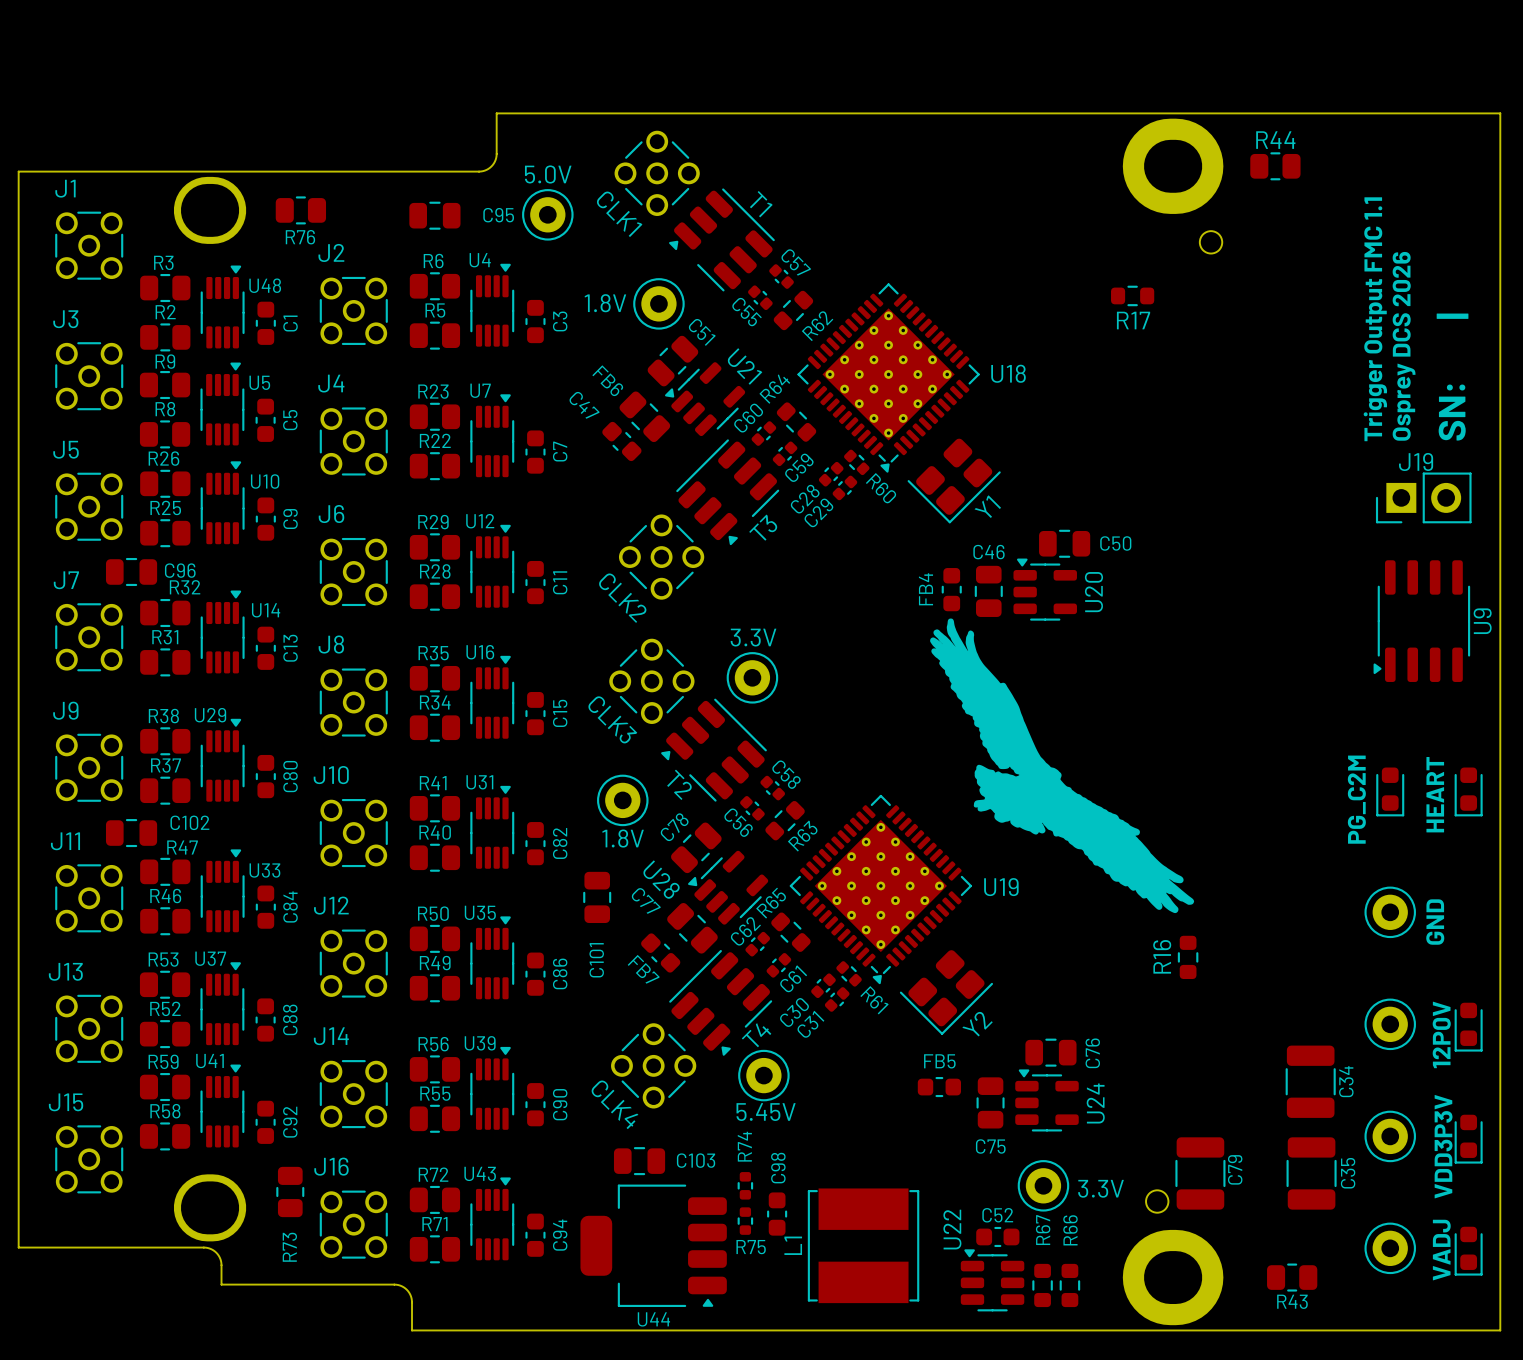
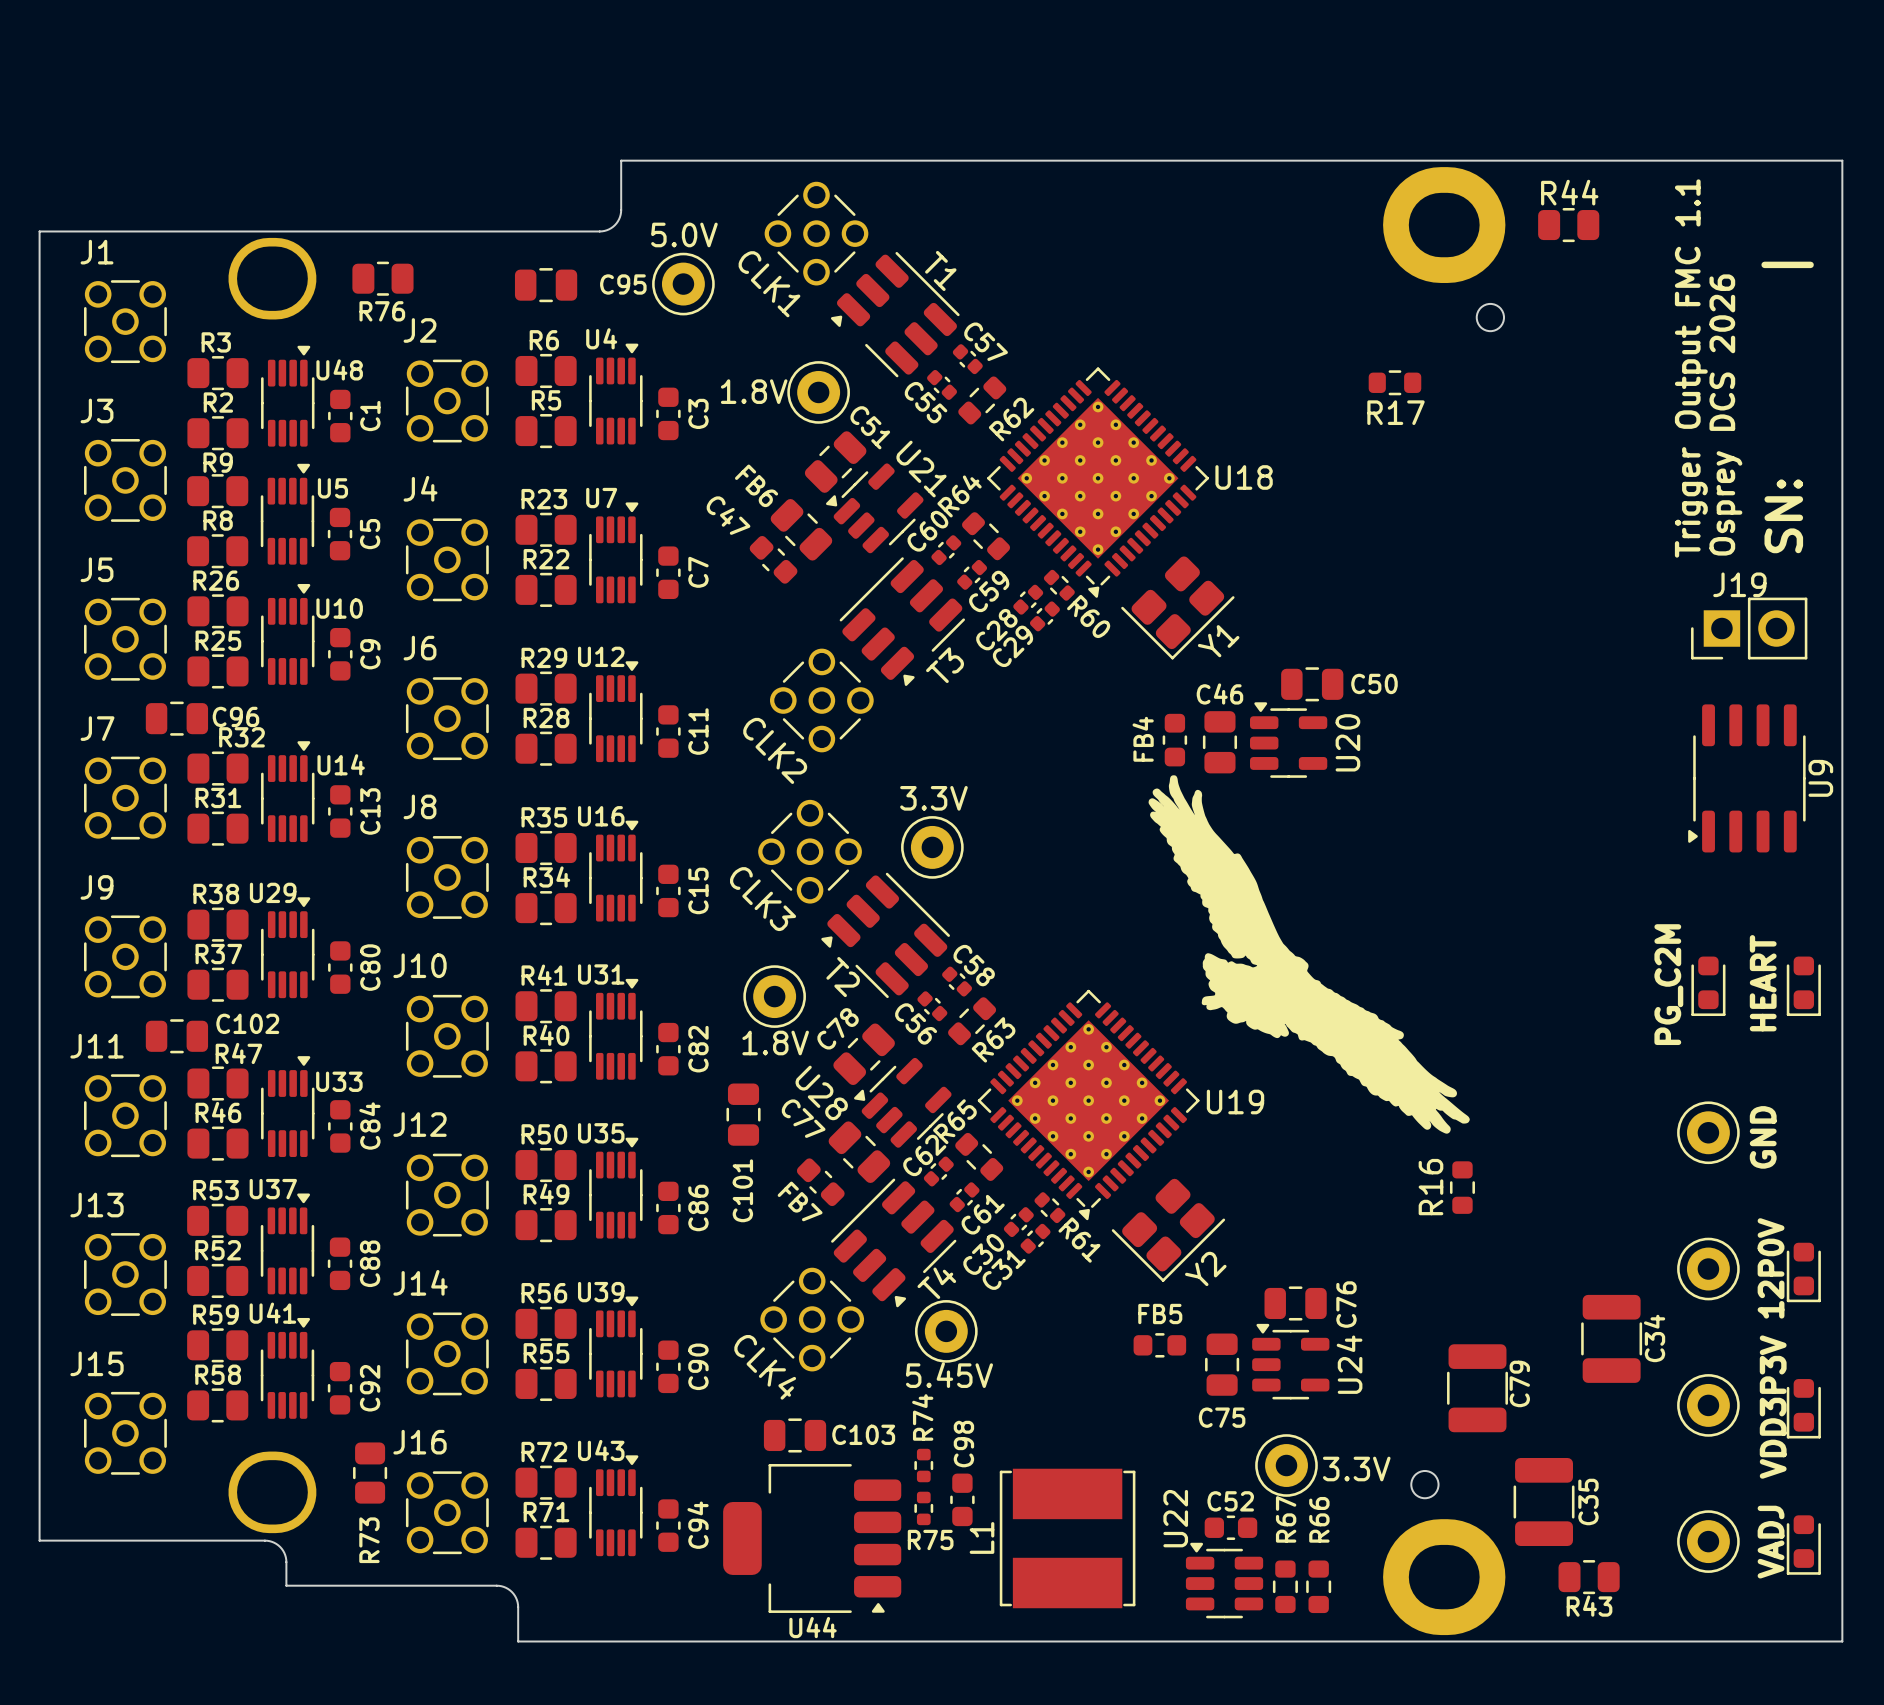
C79 position: (1200, 1173) -> (1477, 1388)
C35 position: (1311, 1173) -> (1544, 1502)

